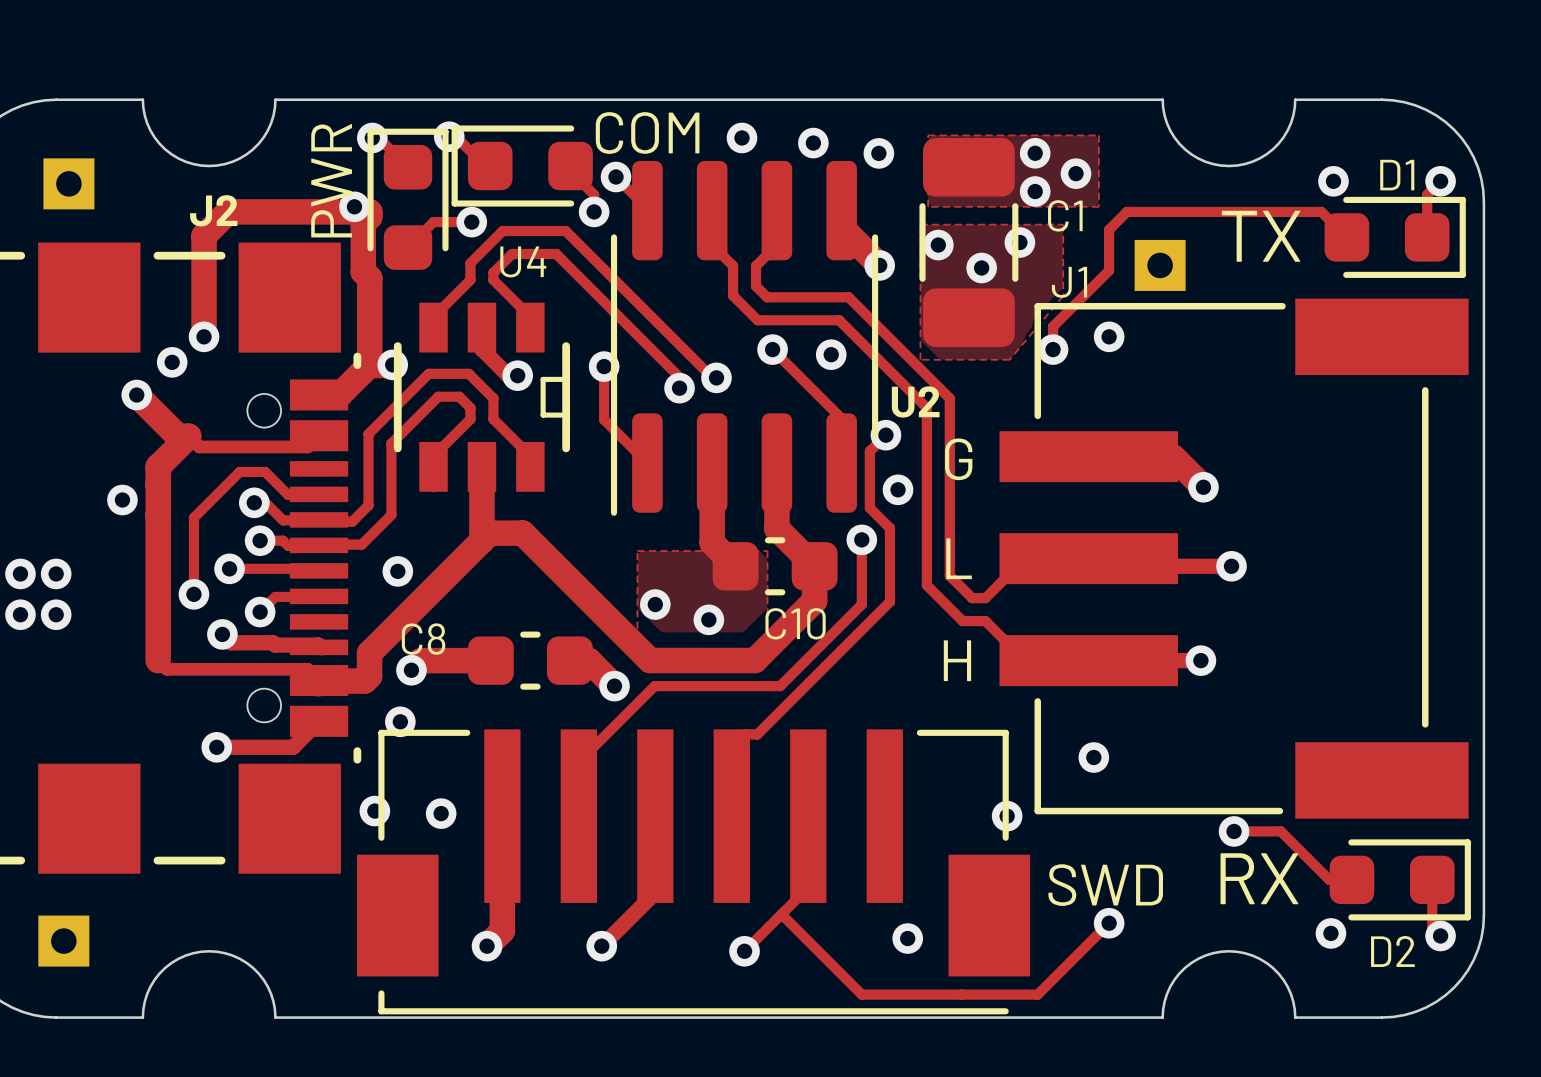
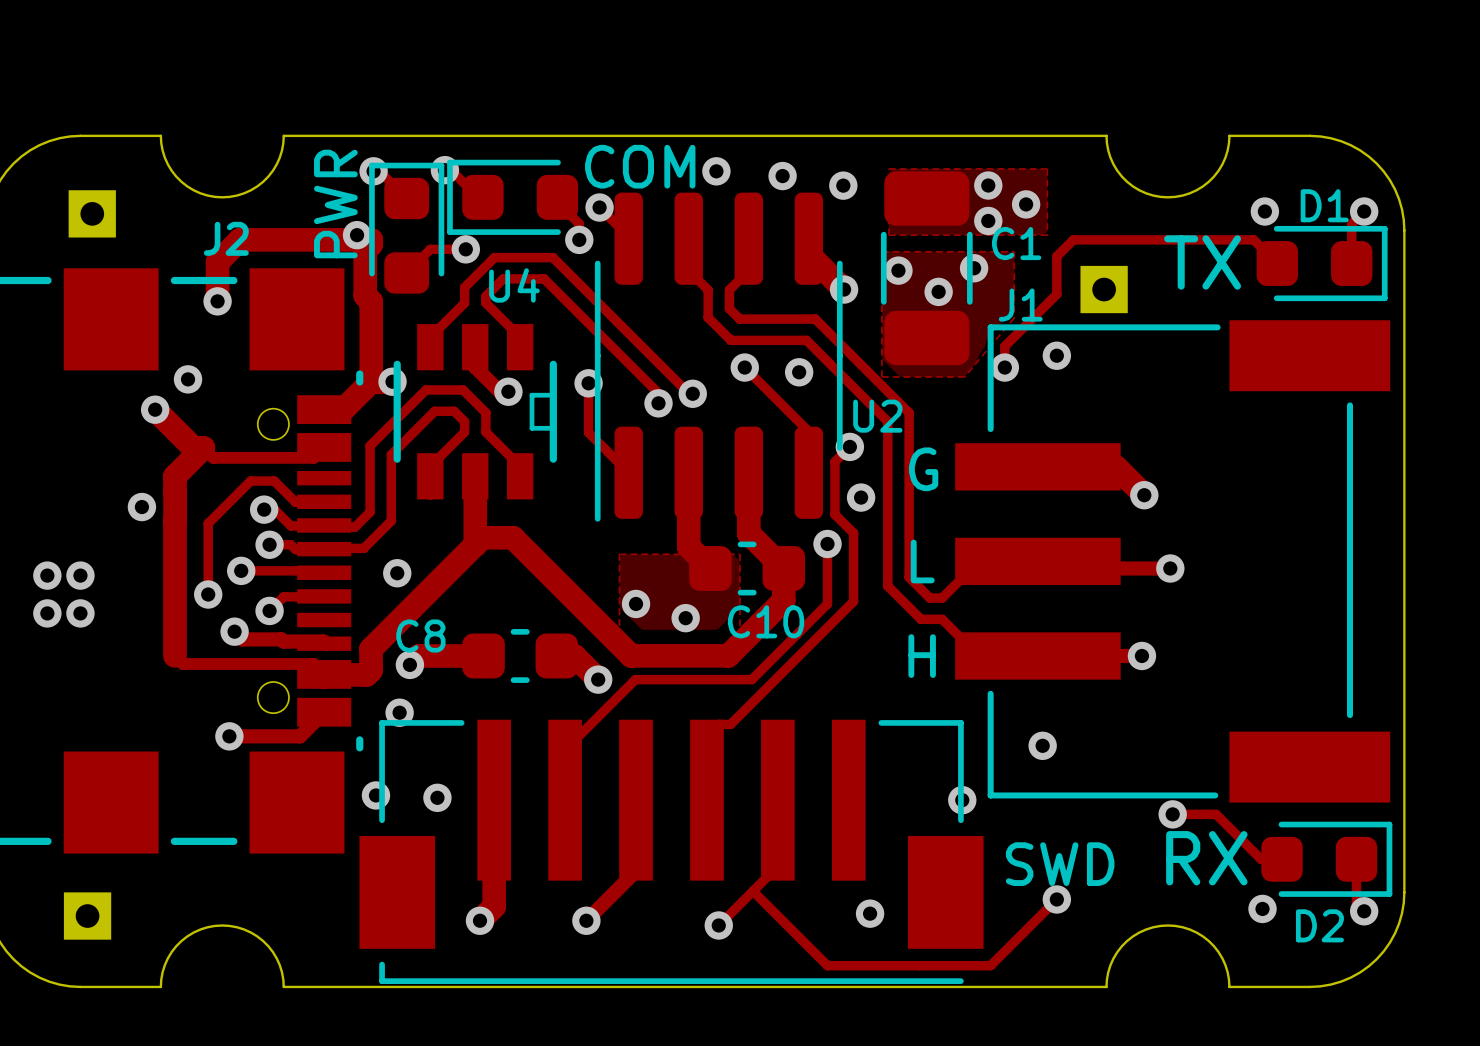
track: (204, 278) (204, 336) -> none
via position: (204, 336) -> (217, 301)

